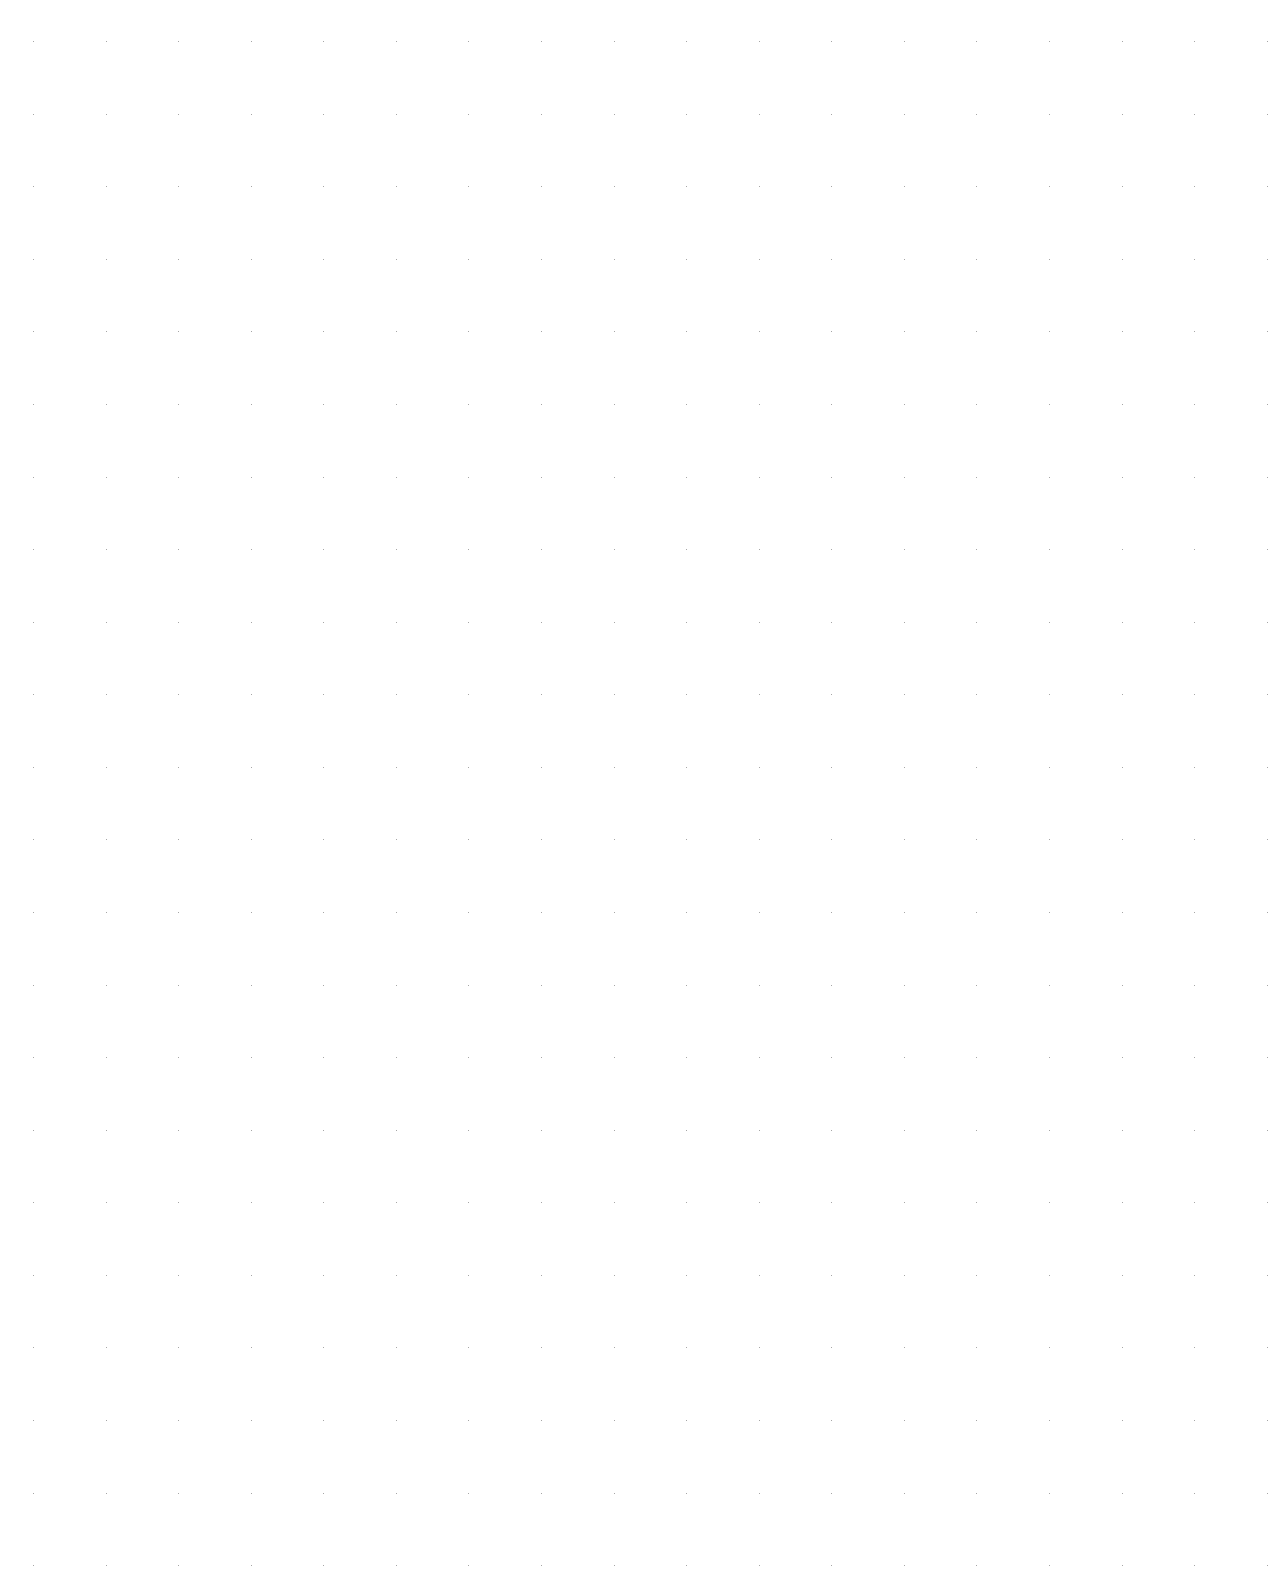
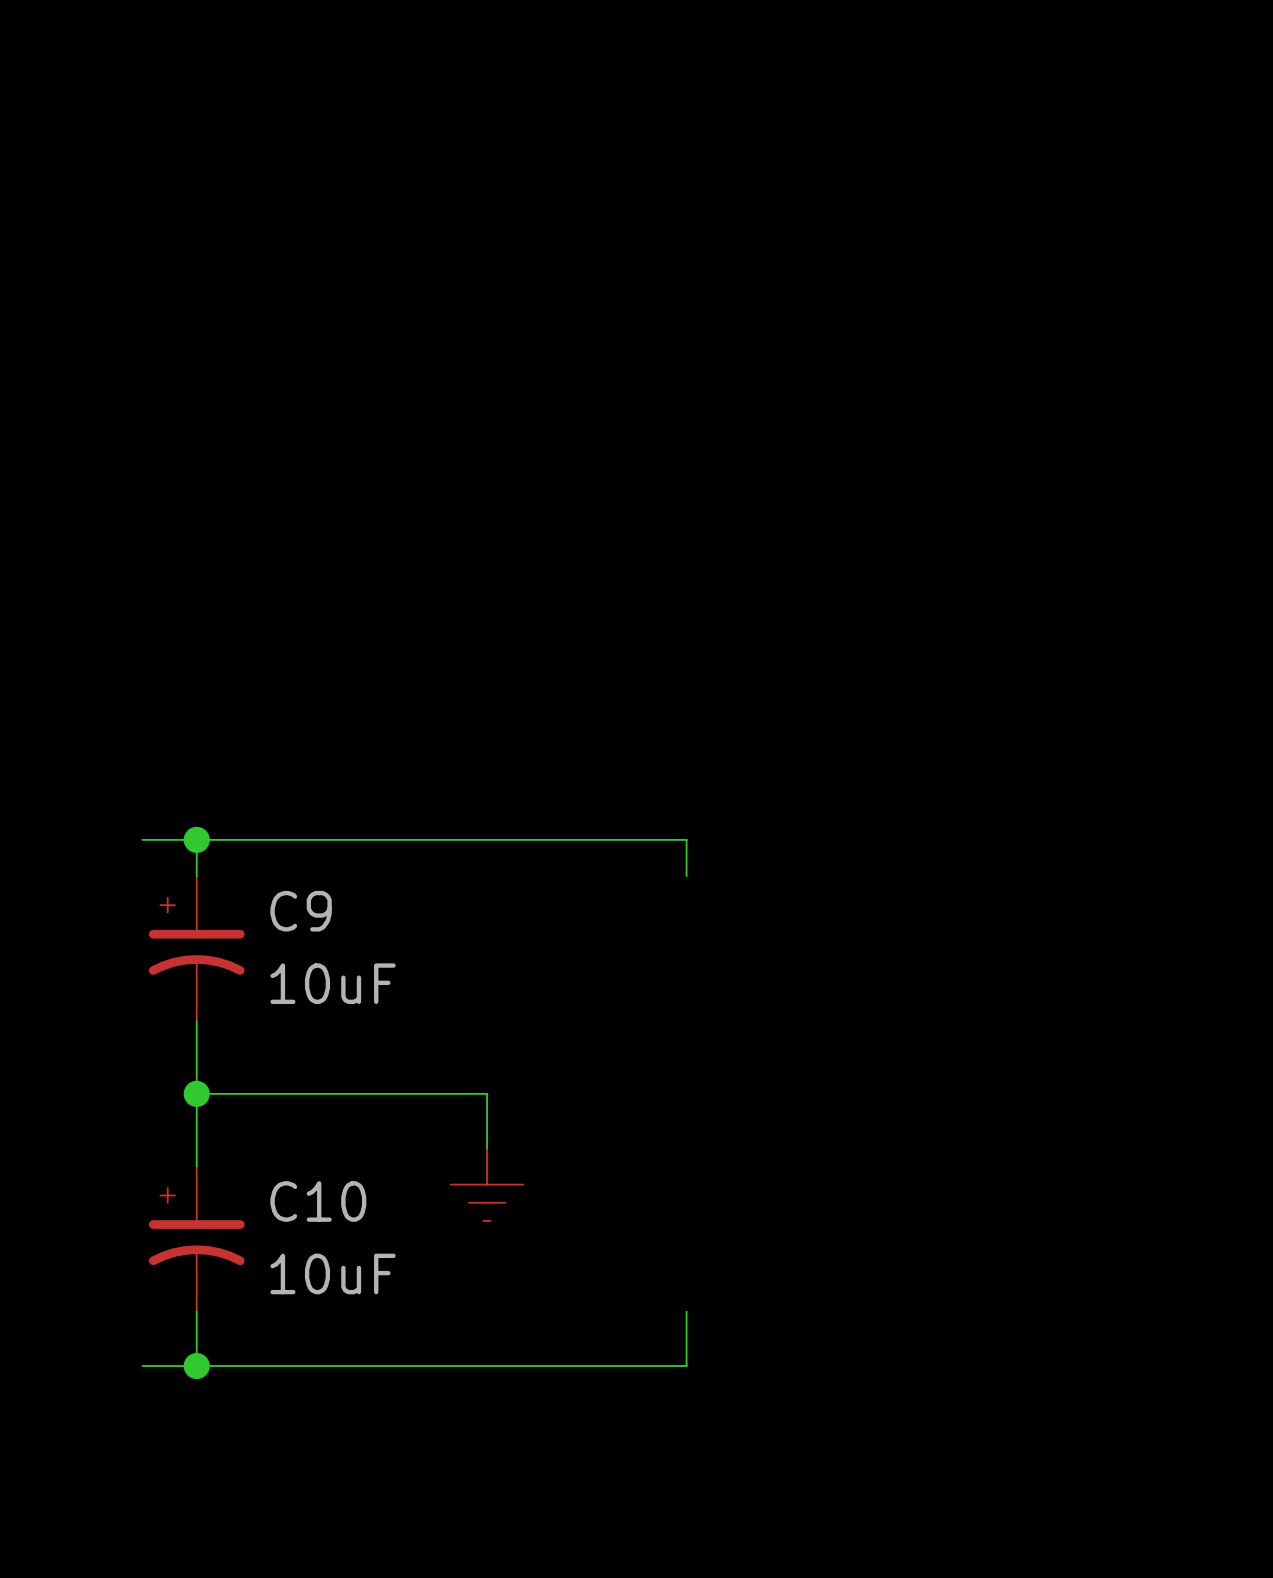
wire: none -> (142, 839) (686, 839) (686, 876)
wire: none -> (196, 839) (196, 876)
junction: none -> (196, 839)
C9: none -> 10uF (196, 948)
wire: none -> (196, 1021) (196, 1166)
wire: none -> (196, 1093) (487, 1093) (487, 1148)
junction: none -> (196, 1093)
power symbol: none -> (487, 1184)
C10: none -> 10uF (196, 1239)
wire: none -> (196, 1311) (196, 1366)
wire: none -> (686, 1311) (686, 1366) (142, 1366)
junction: none -> (196, 1366)

